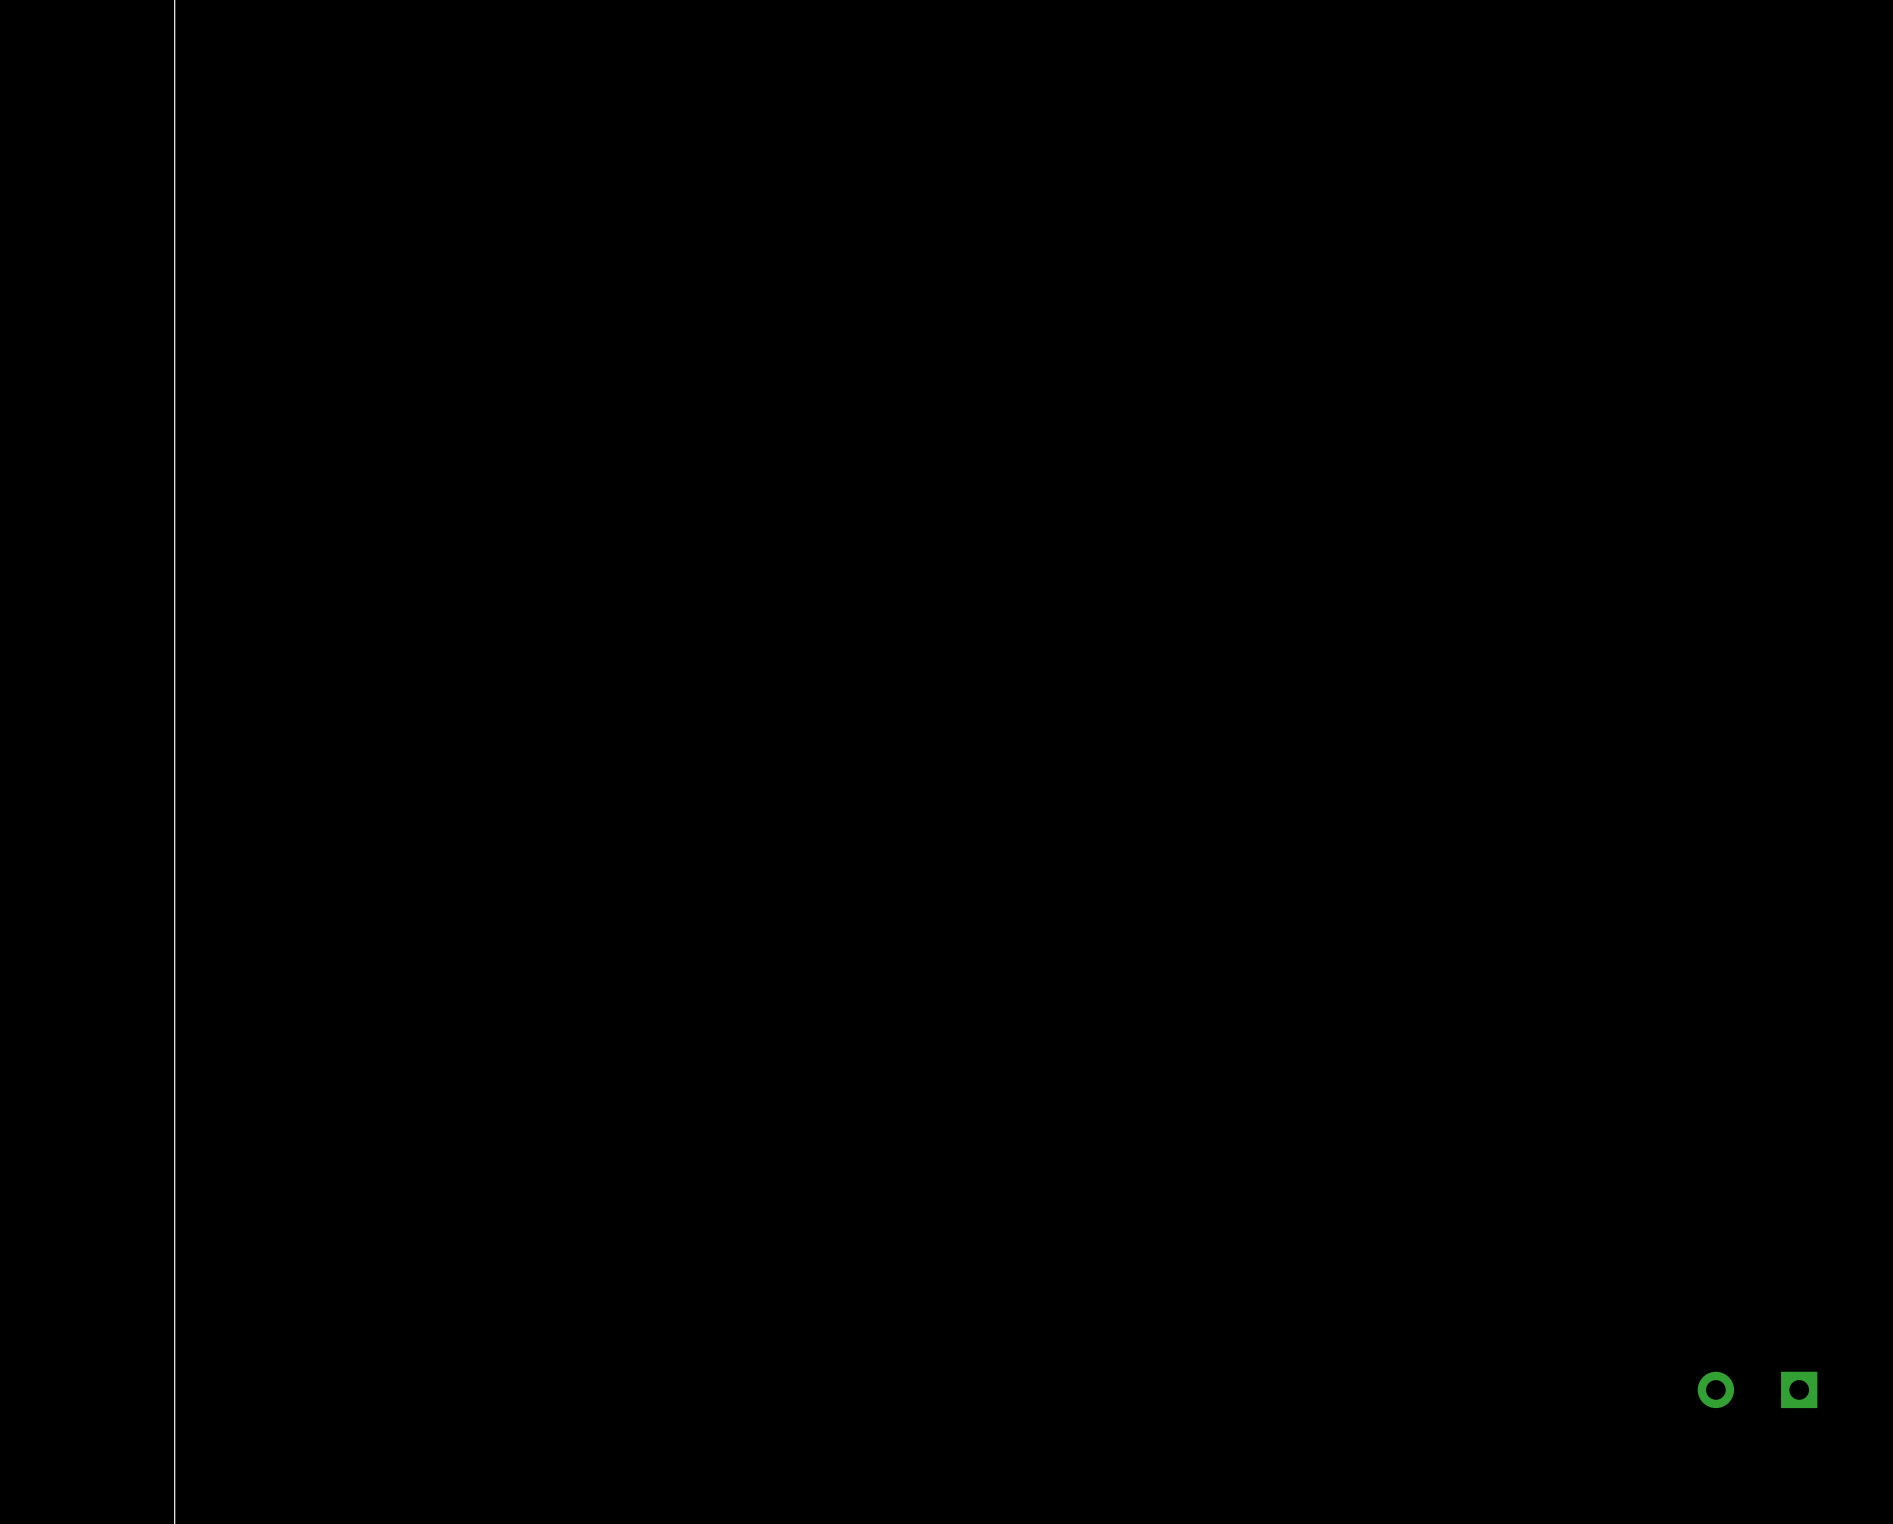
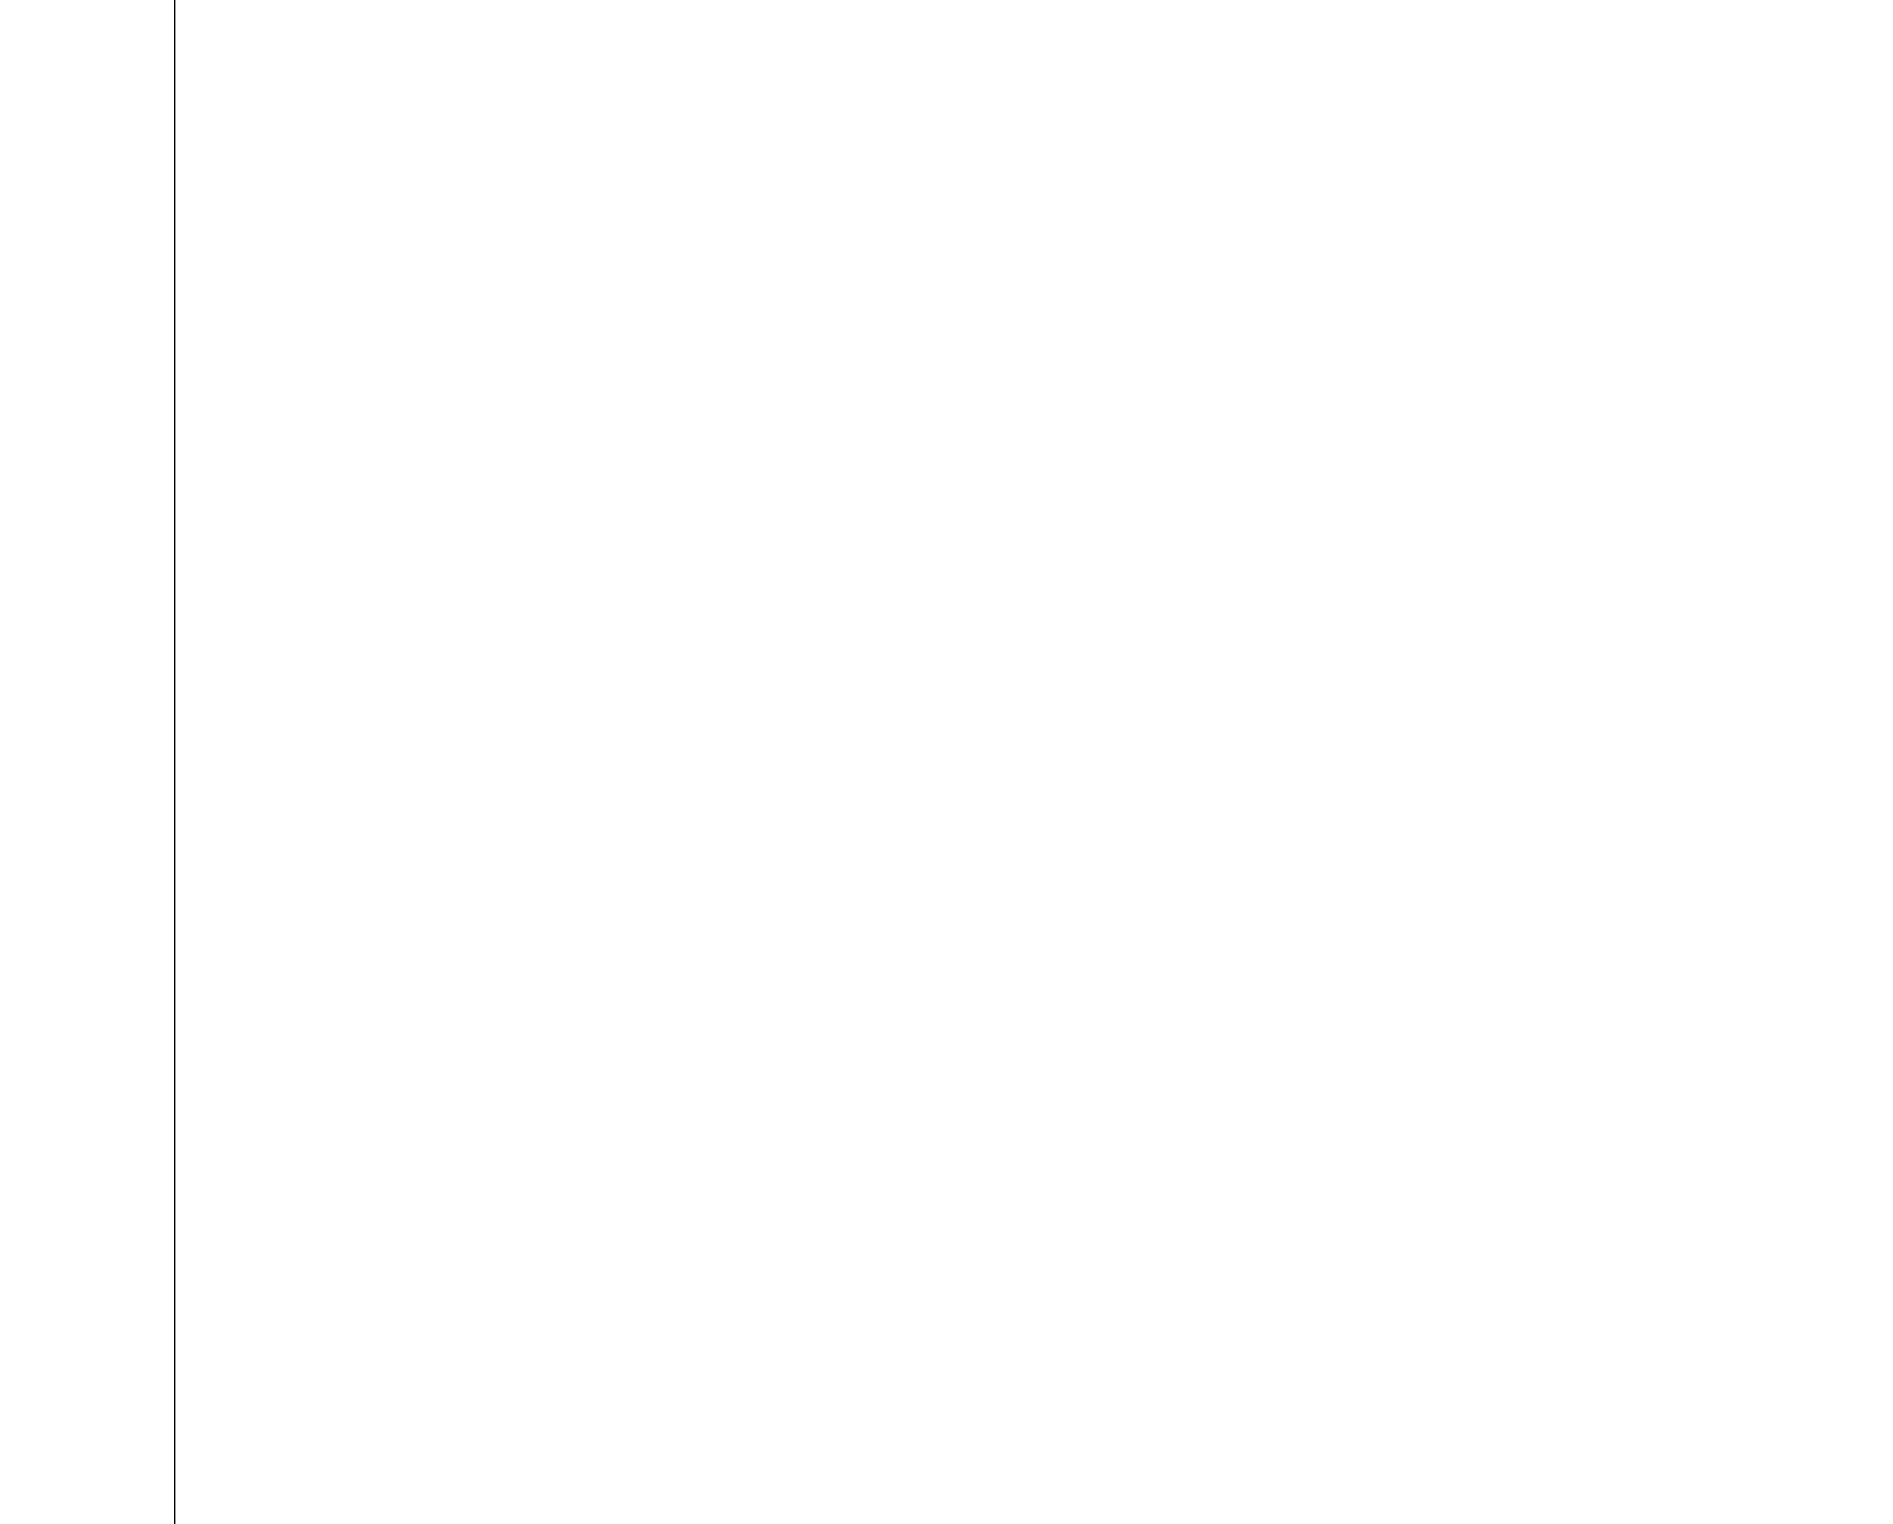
part: (1757, 1389) -> none

